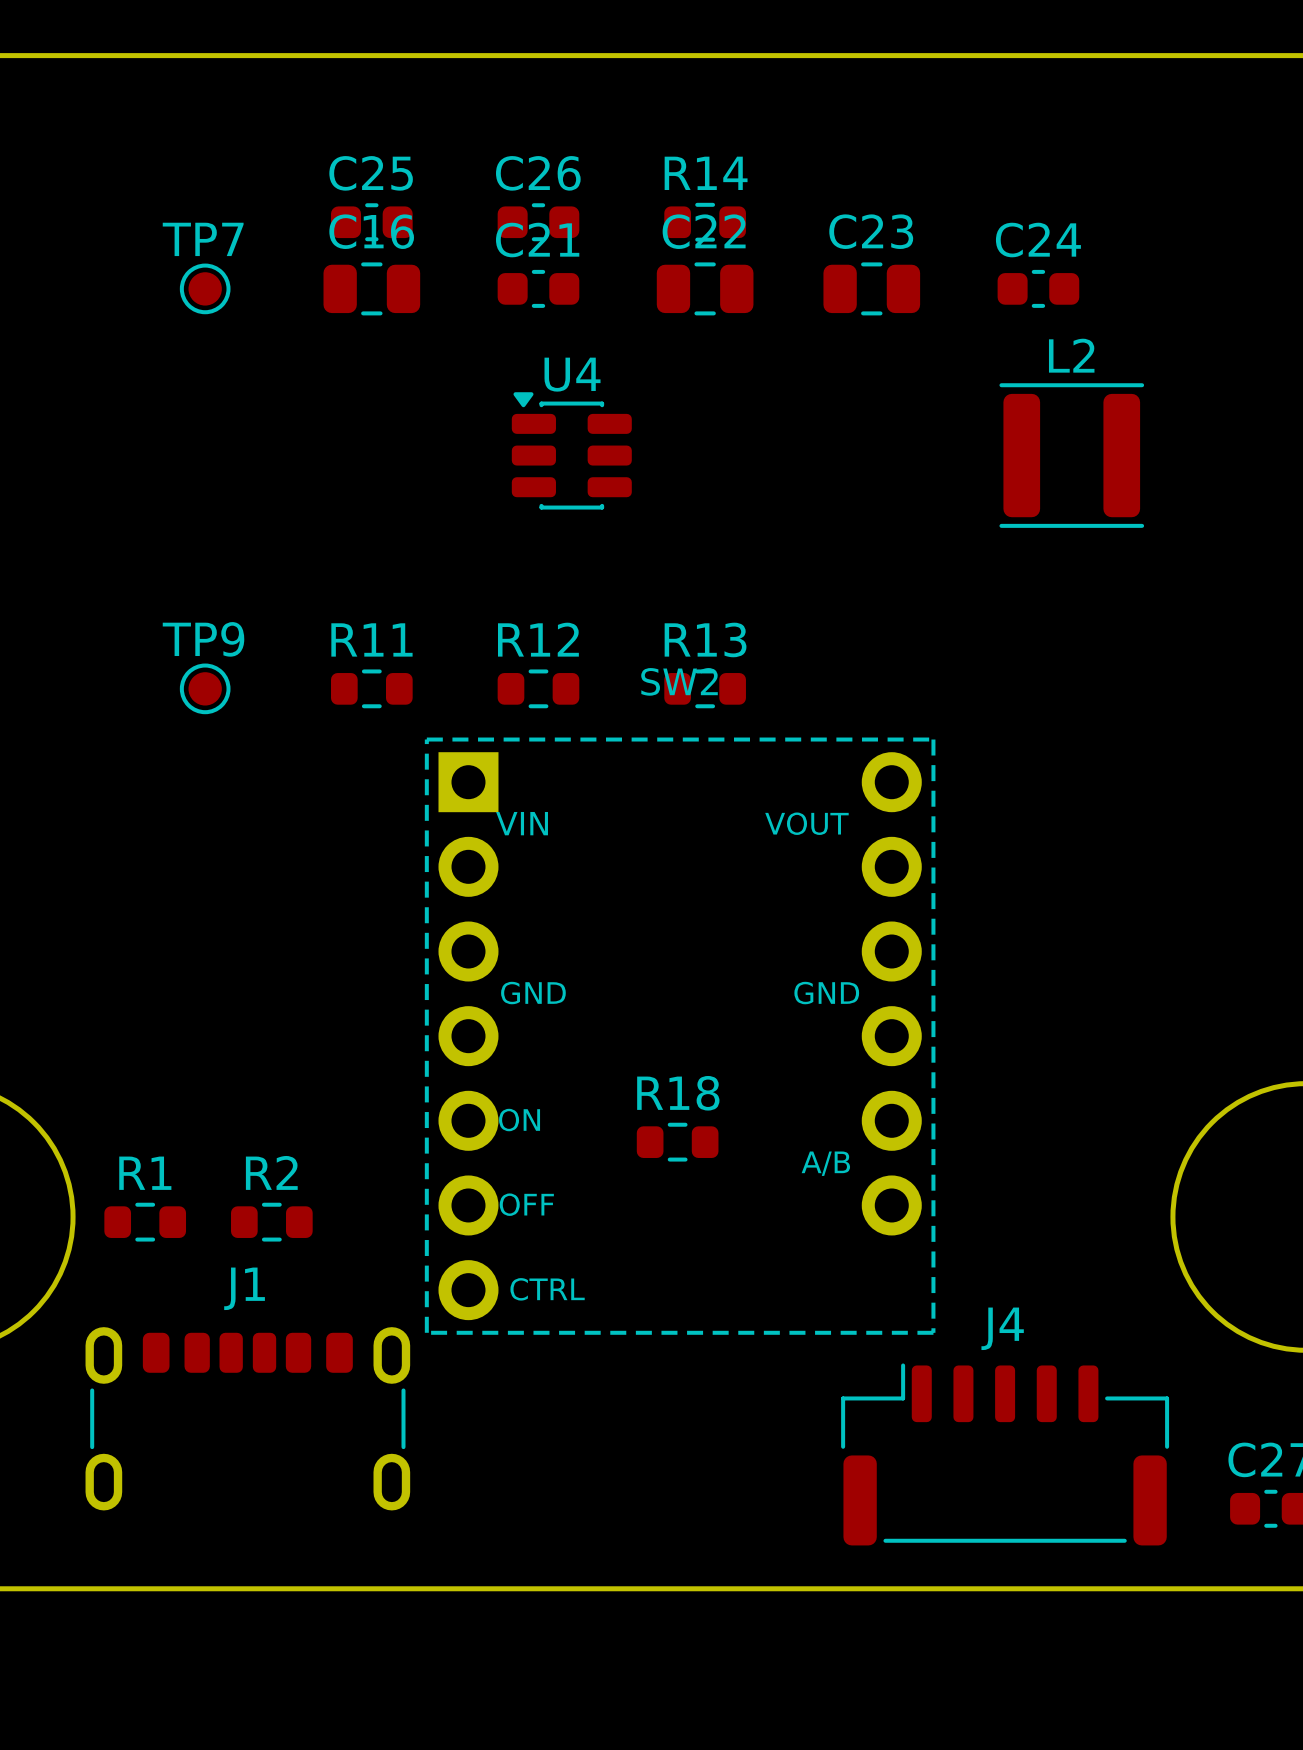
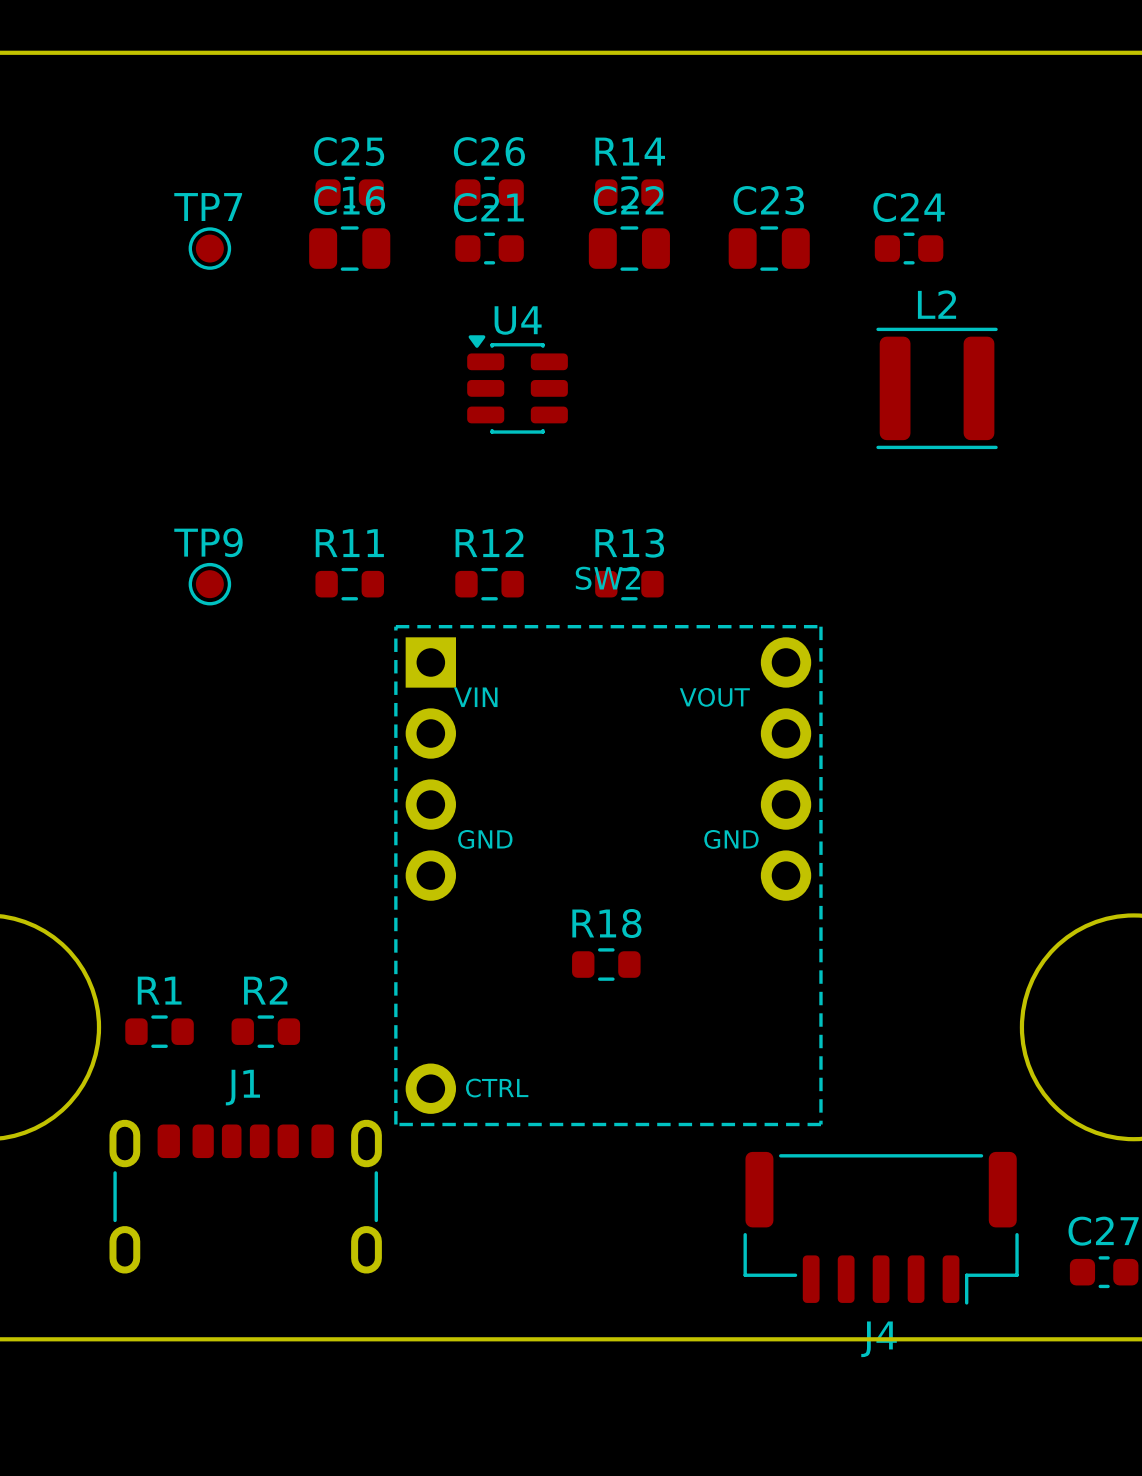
SW2 footprint: [424, 737, 936, 1335] -> [394, 625, 823, 1127]
J4 rotation: 0° (1005, 1454) -> 180° (881, 1228)

